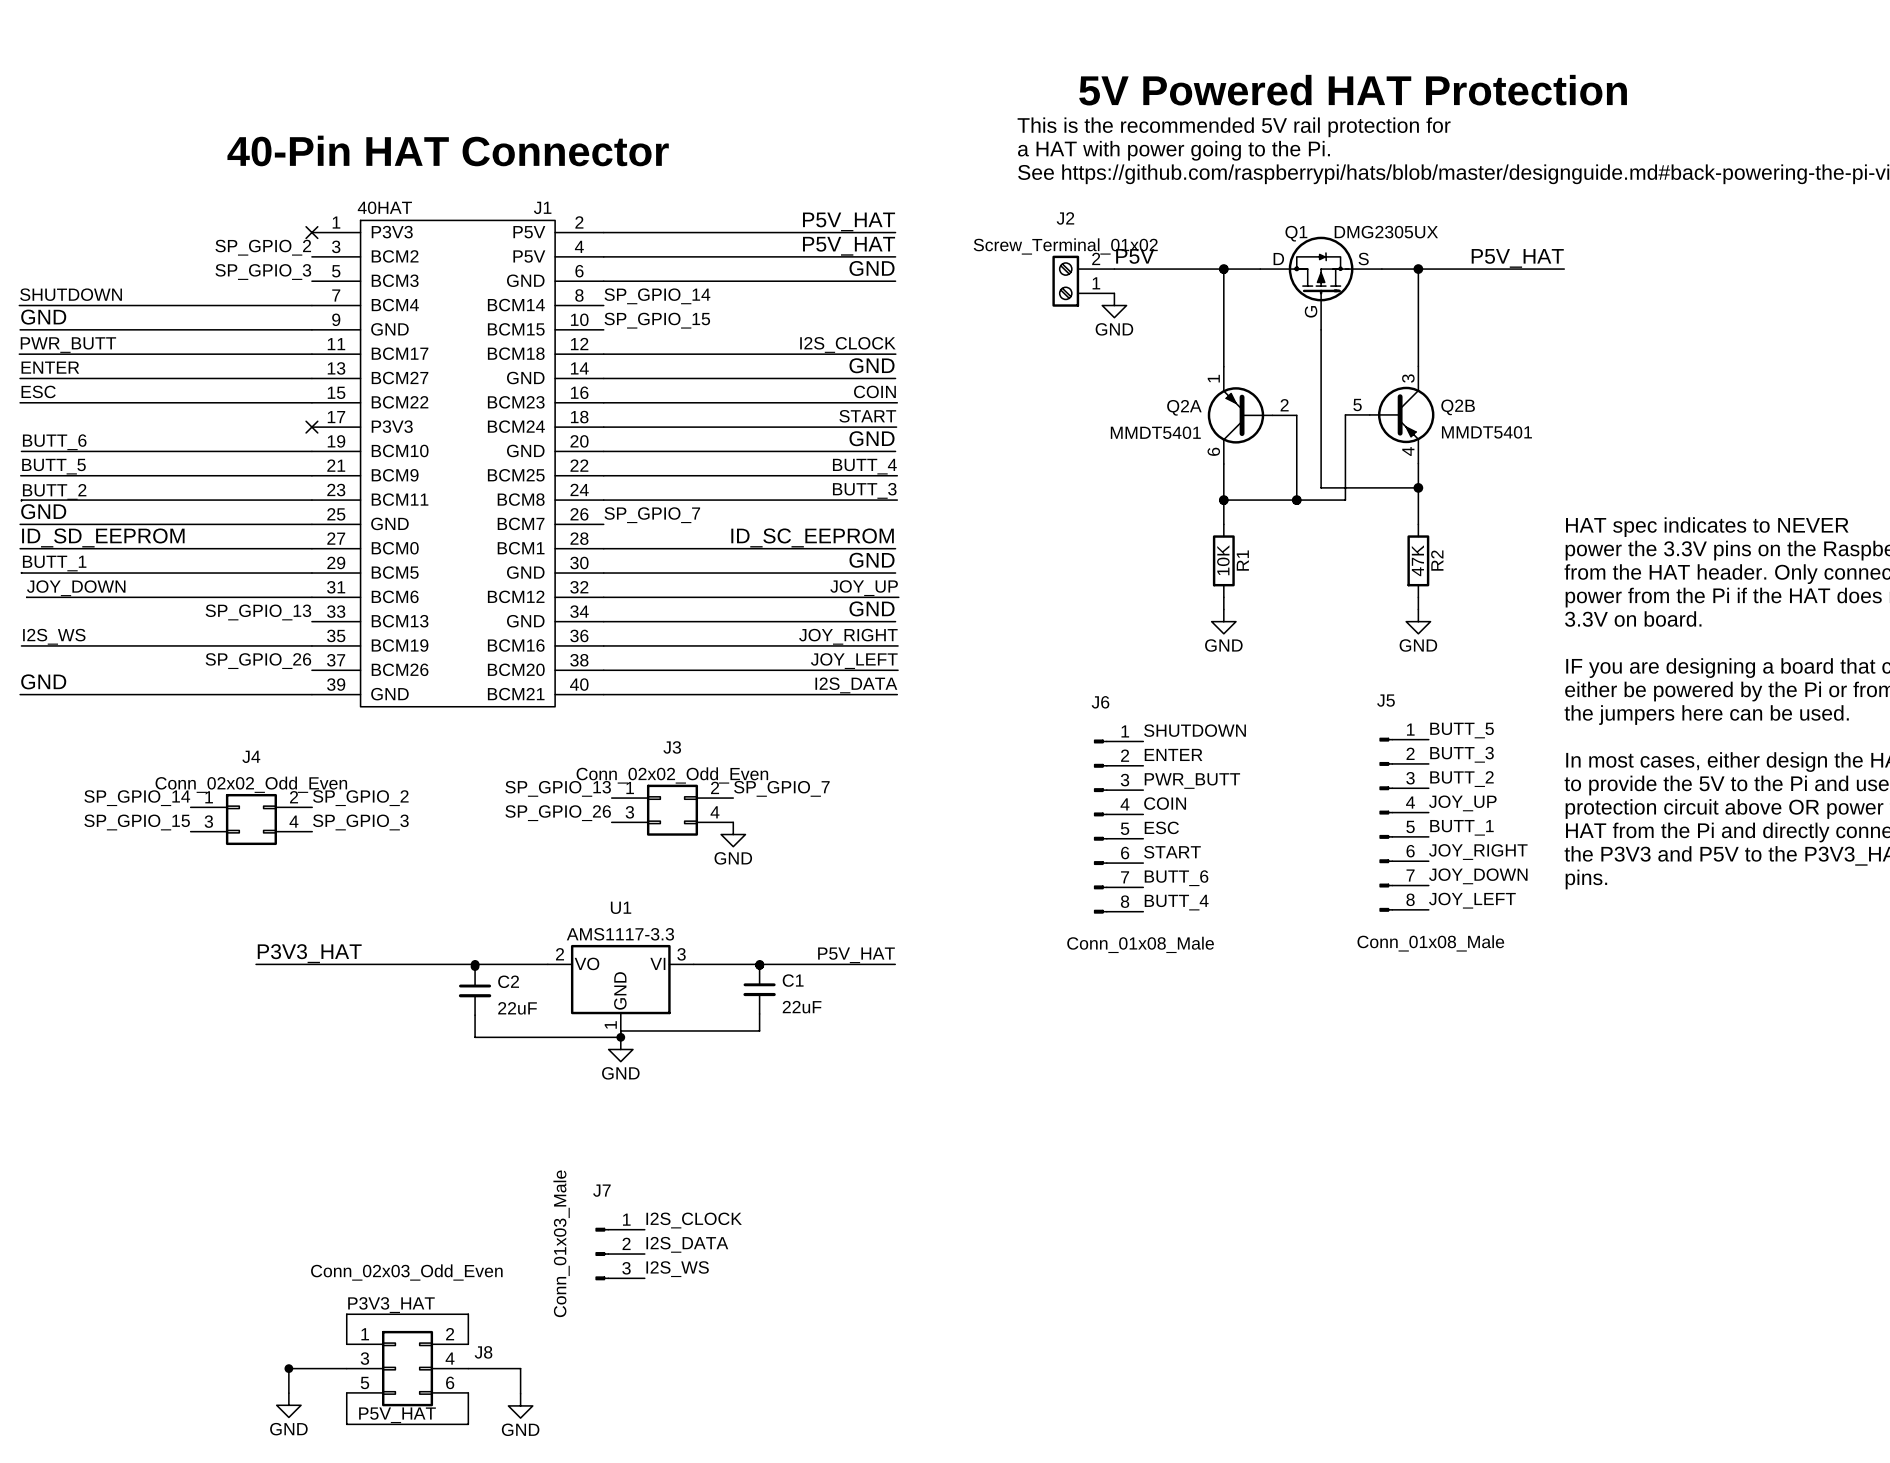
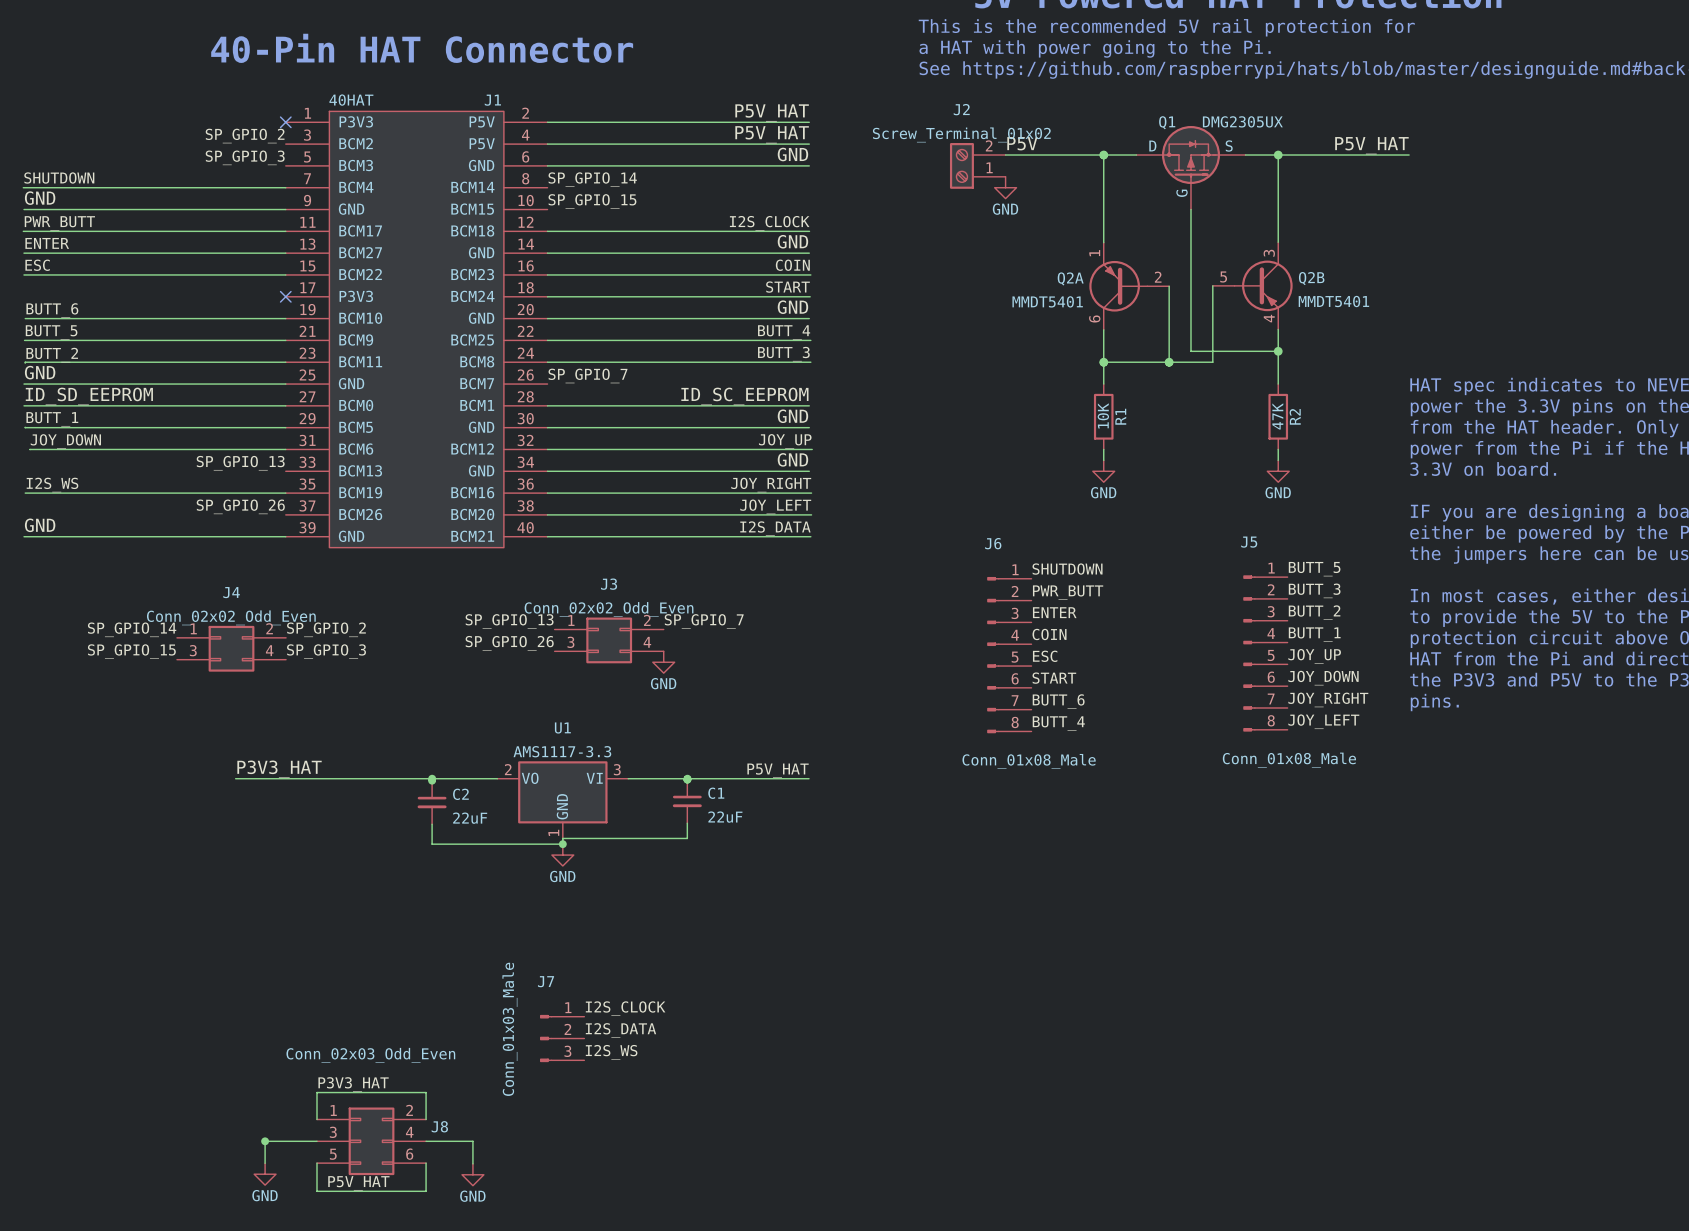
label: ENTER (1173, 754) -> PWR_BUTT (1068, 592)
label: PWR_BUTT (1192, 781) -> ENTER (1054, 612)
label: JOY_UP (1462, 803) -> BUTT_1 (1314, 634)
label: BUTT_1 (1461, 827) -> JOY_UP (1314, 656)
label: JOY_RIGHT (1478, 852) -> JOY_DOWN (1323, 678)
label: JOY_DOWN (1478, 876) -> JOY_RIGHT (1328, 699)

